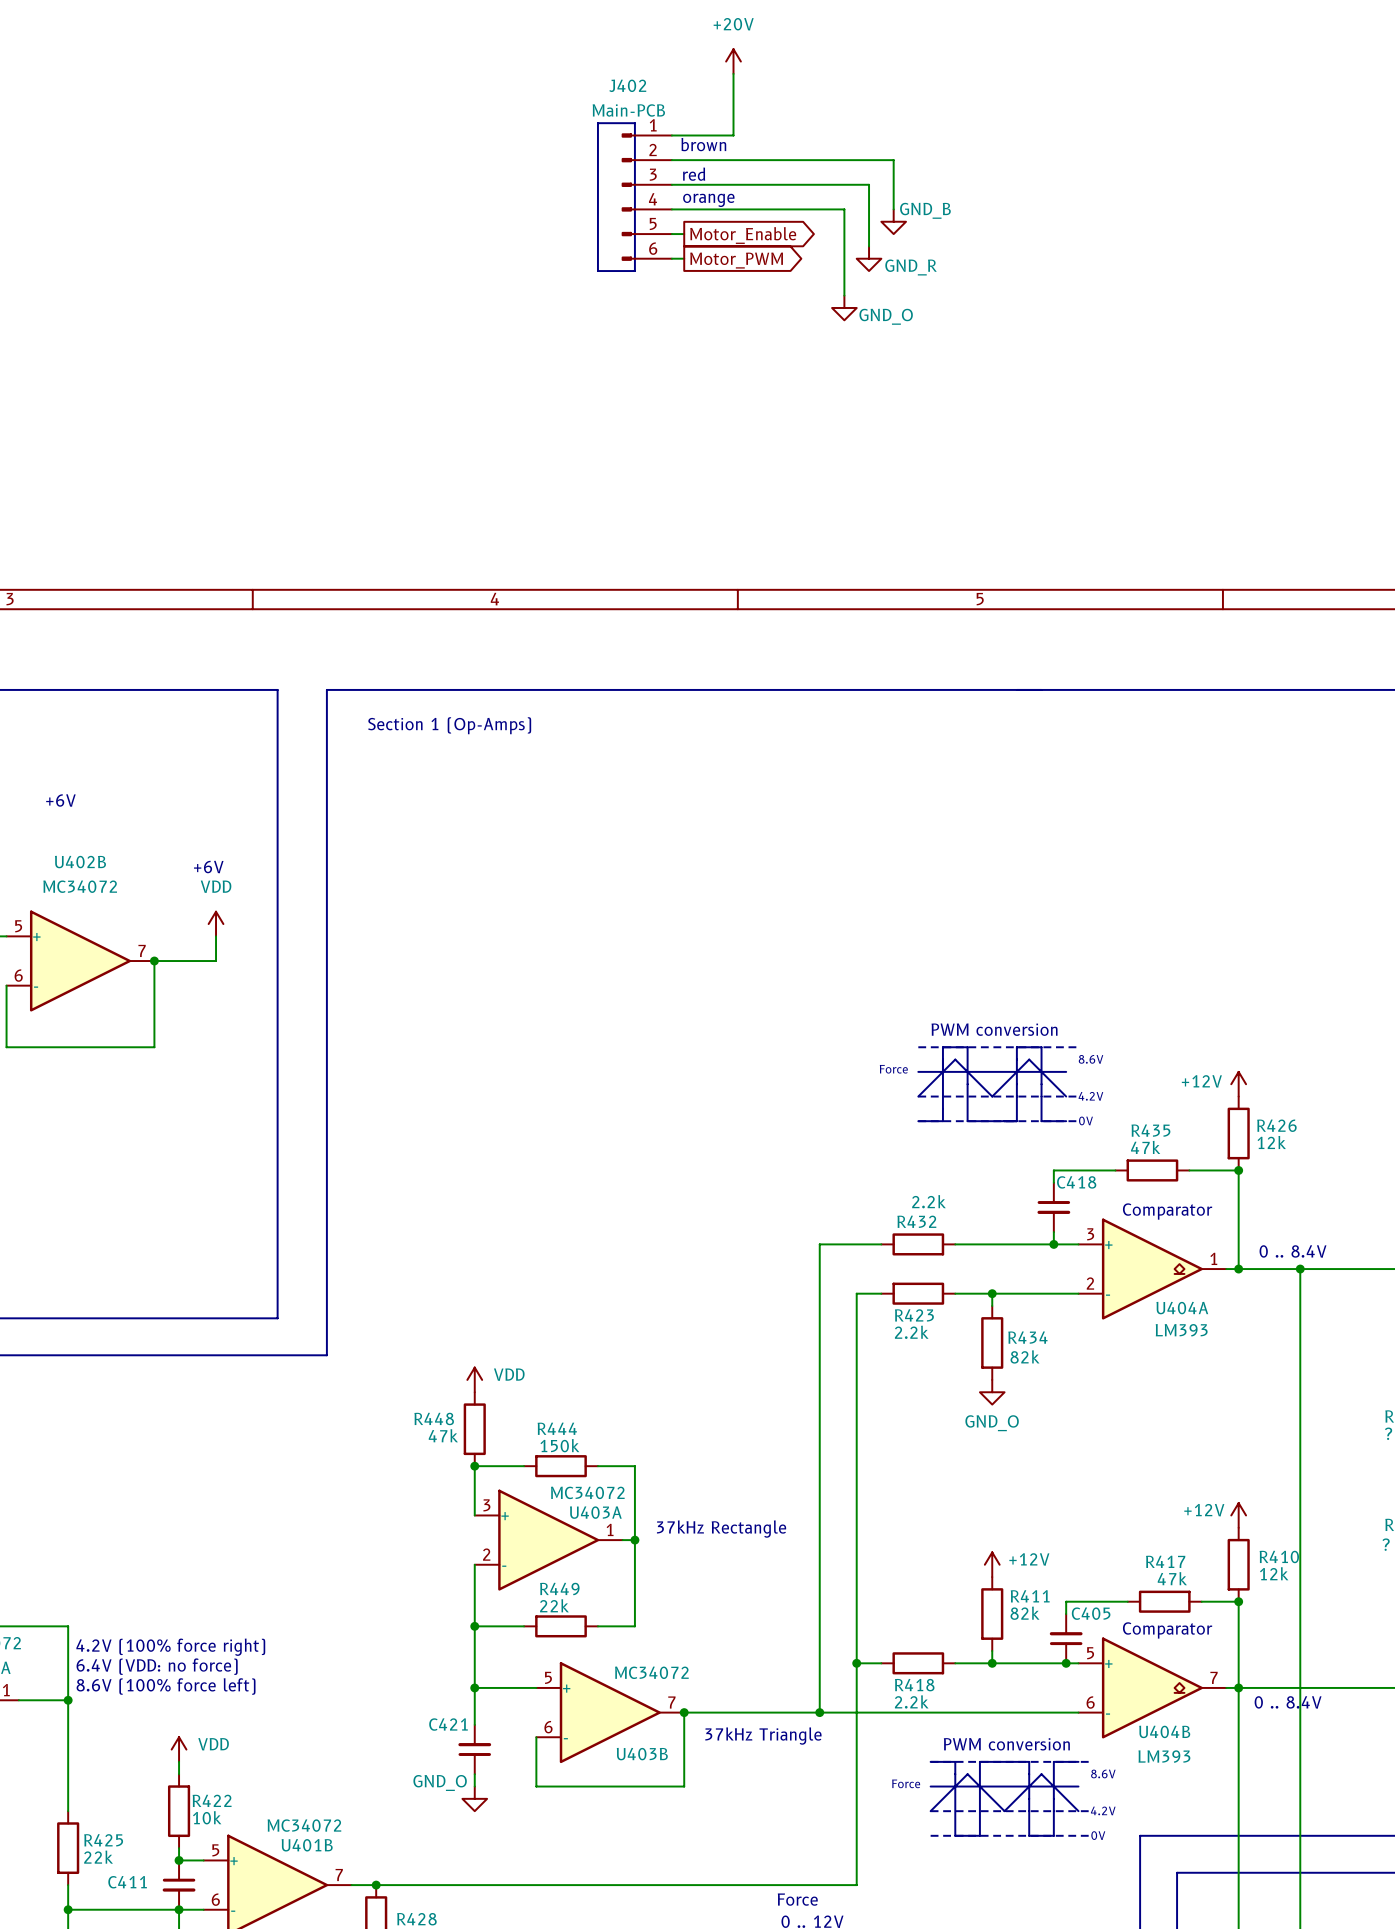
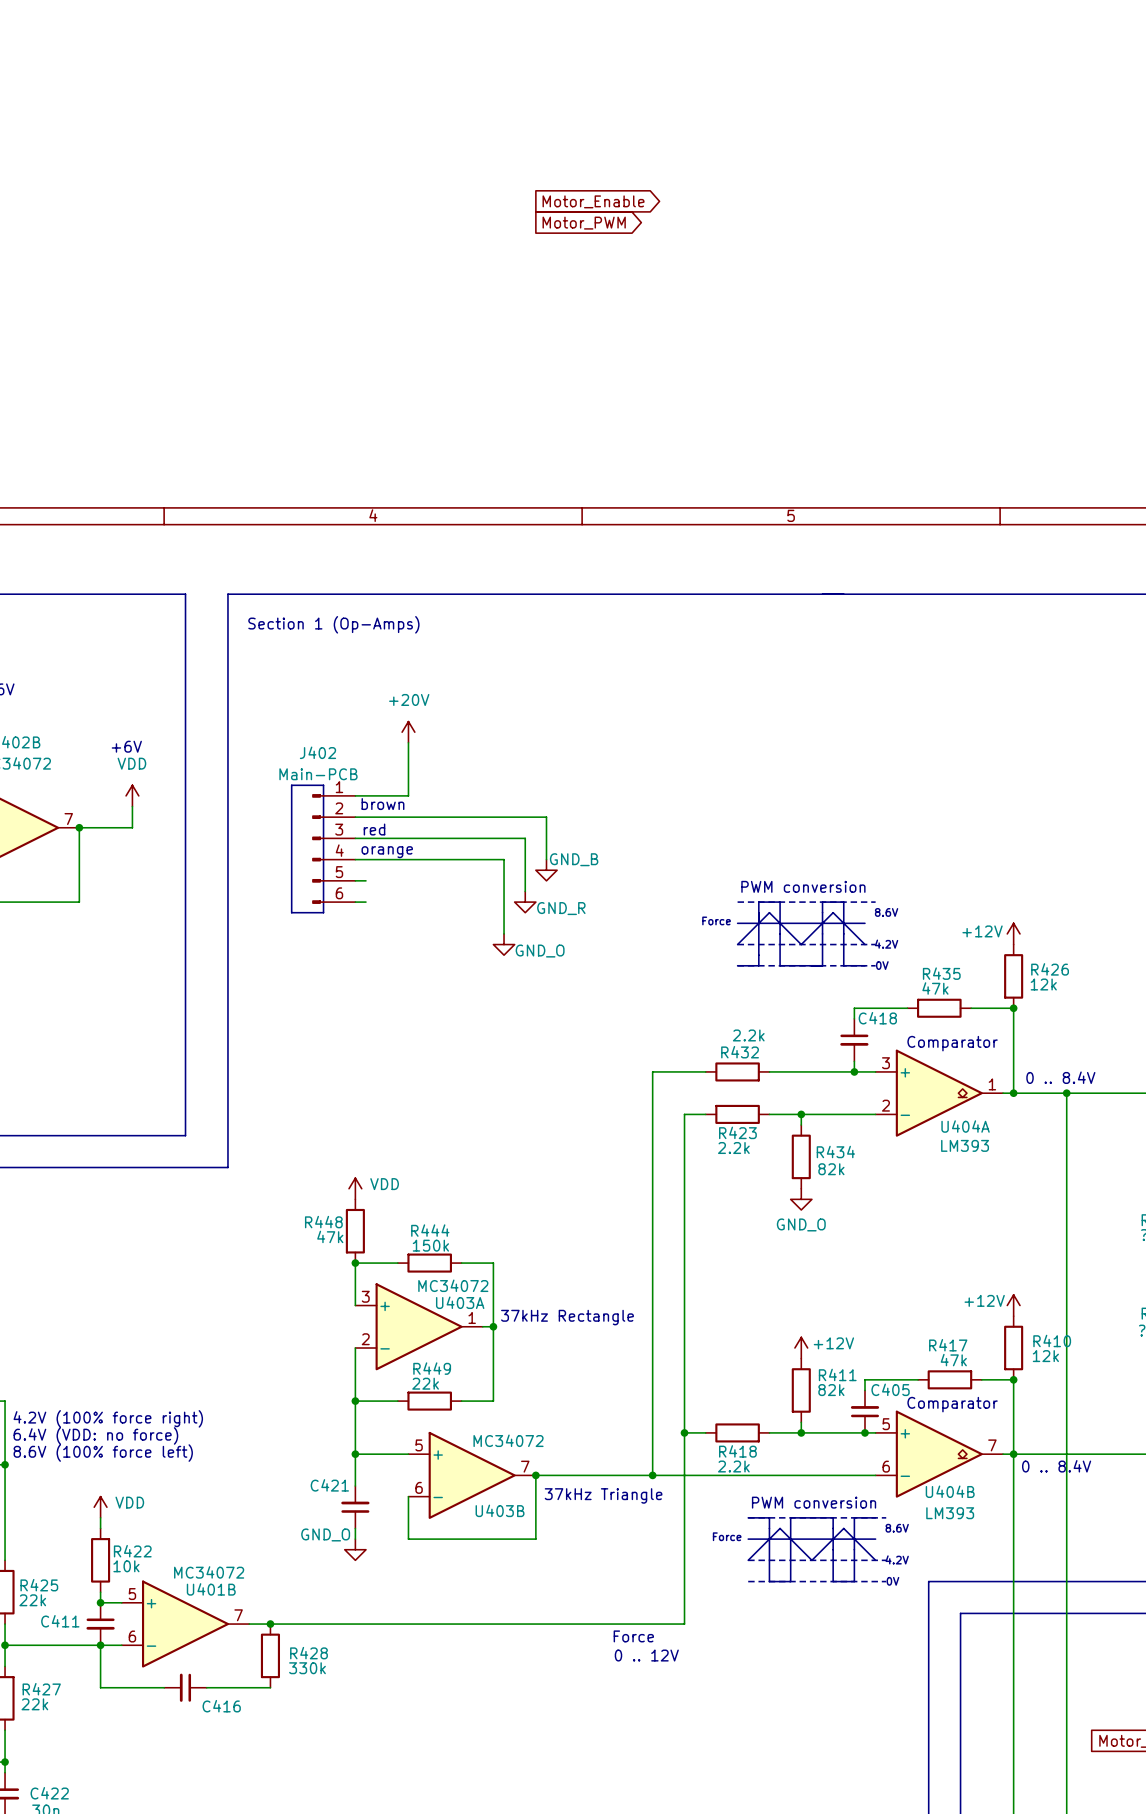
power symbol: +20V (733, 61) -> none
wire: (733, 73) (733, 135) (671, 135) -> none
line: (597, 123) (634, 123) (634, 271) (597, 271) (597, 123) -> none
text: brown (703, 144) -> none
wire: (671, 160) (893, 160) (893, 209) -> none
text: red (694, 174) -> none
wire: (671, 184) (869, 184) (869, 246) -> none
J402 position: (646, 197) -> (333, 849)
text: orange (708, 200) -> none
wire: (671, 209) (844, 209) (844, 295) -> none
power symbol: GND_B (893, 221) -> none
wire: (671, 234) (684, 234) -> none
wire: (671, 258) (684, 258) -> none
power symbol: GND_R (869, 258) -> none
power symbol: GND_O (844, 307) -> none
power symbol: none -> +20V (408, 732)
wire: none -> (408, 742) (408, 795) (355, 795)
line: none -> (291, 785) (323, 785) (323, 912) (291, 912) (291, 785)
text: none -> brown (382, 804)
wire: none -> (355, 817) (546, 817) (546, 859)
text: none -> red (374, 829)
wire: none -> (355, 838) (525, 838) (525, 891)
text: none -> orange (387, 852)
wire: none -> (355, 859) (504, 859) (504, 933)
power symbol: none -> GND_B (546, 870)
wire: none -> (355, 880) (366, 880)
wire: none -> (355, 902) (366, 902)
power symbol: none -> GND_R (525, 902)
power symbol: none -> GND_O (504, 944)

